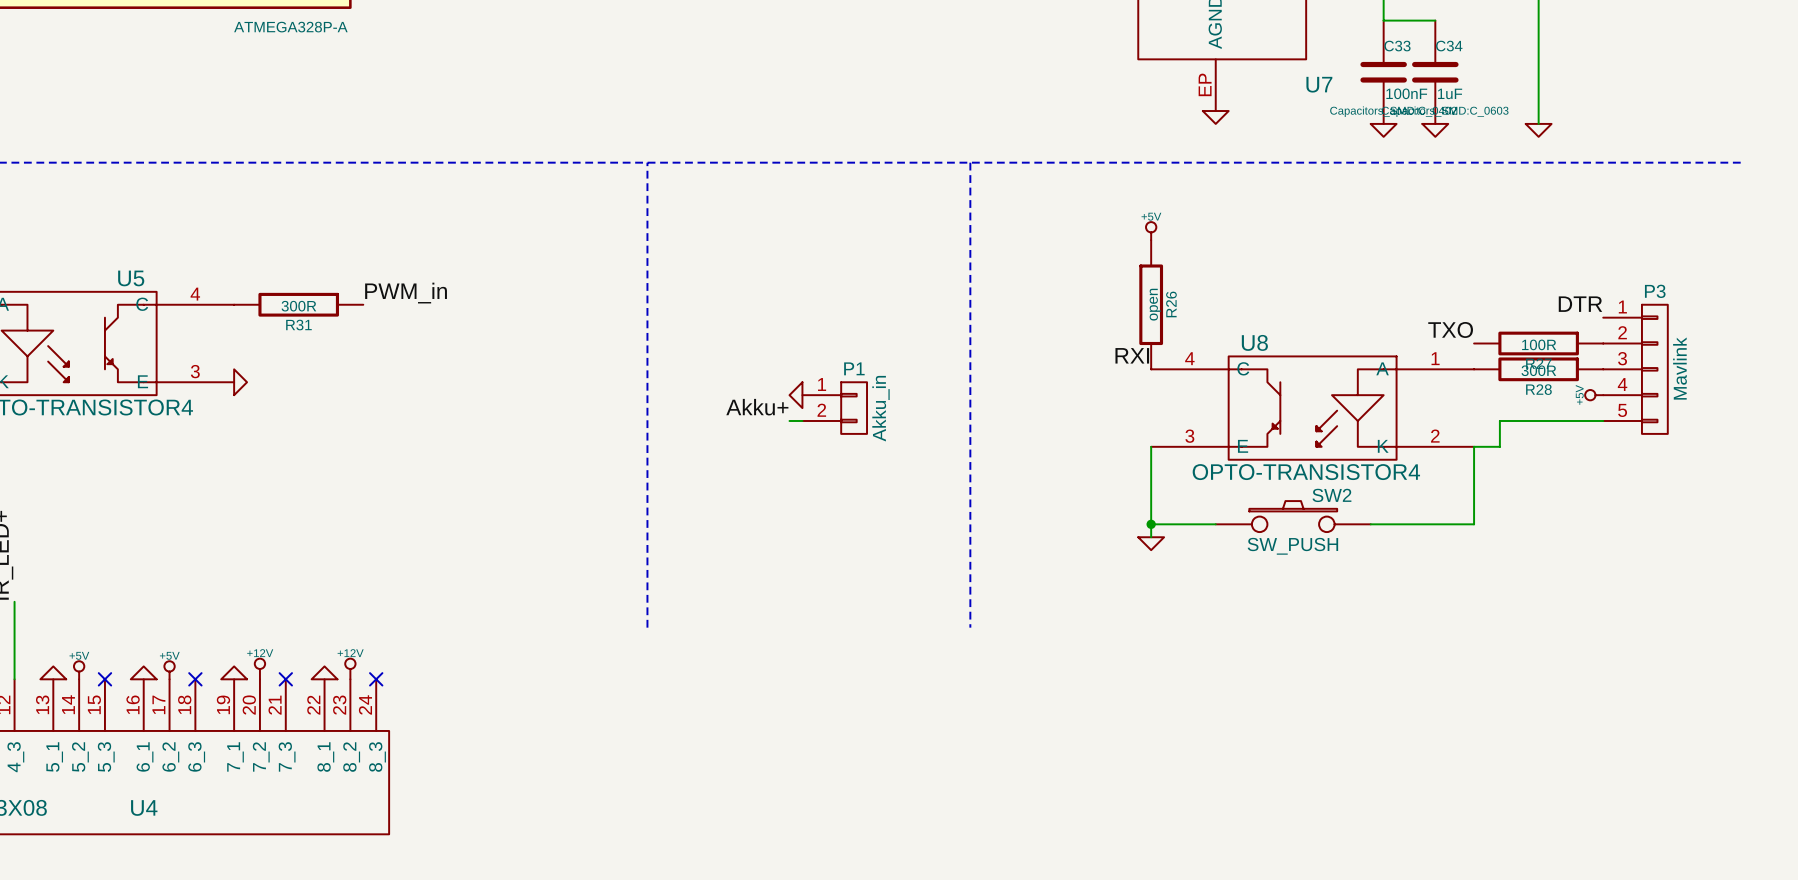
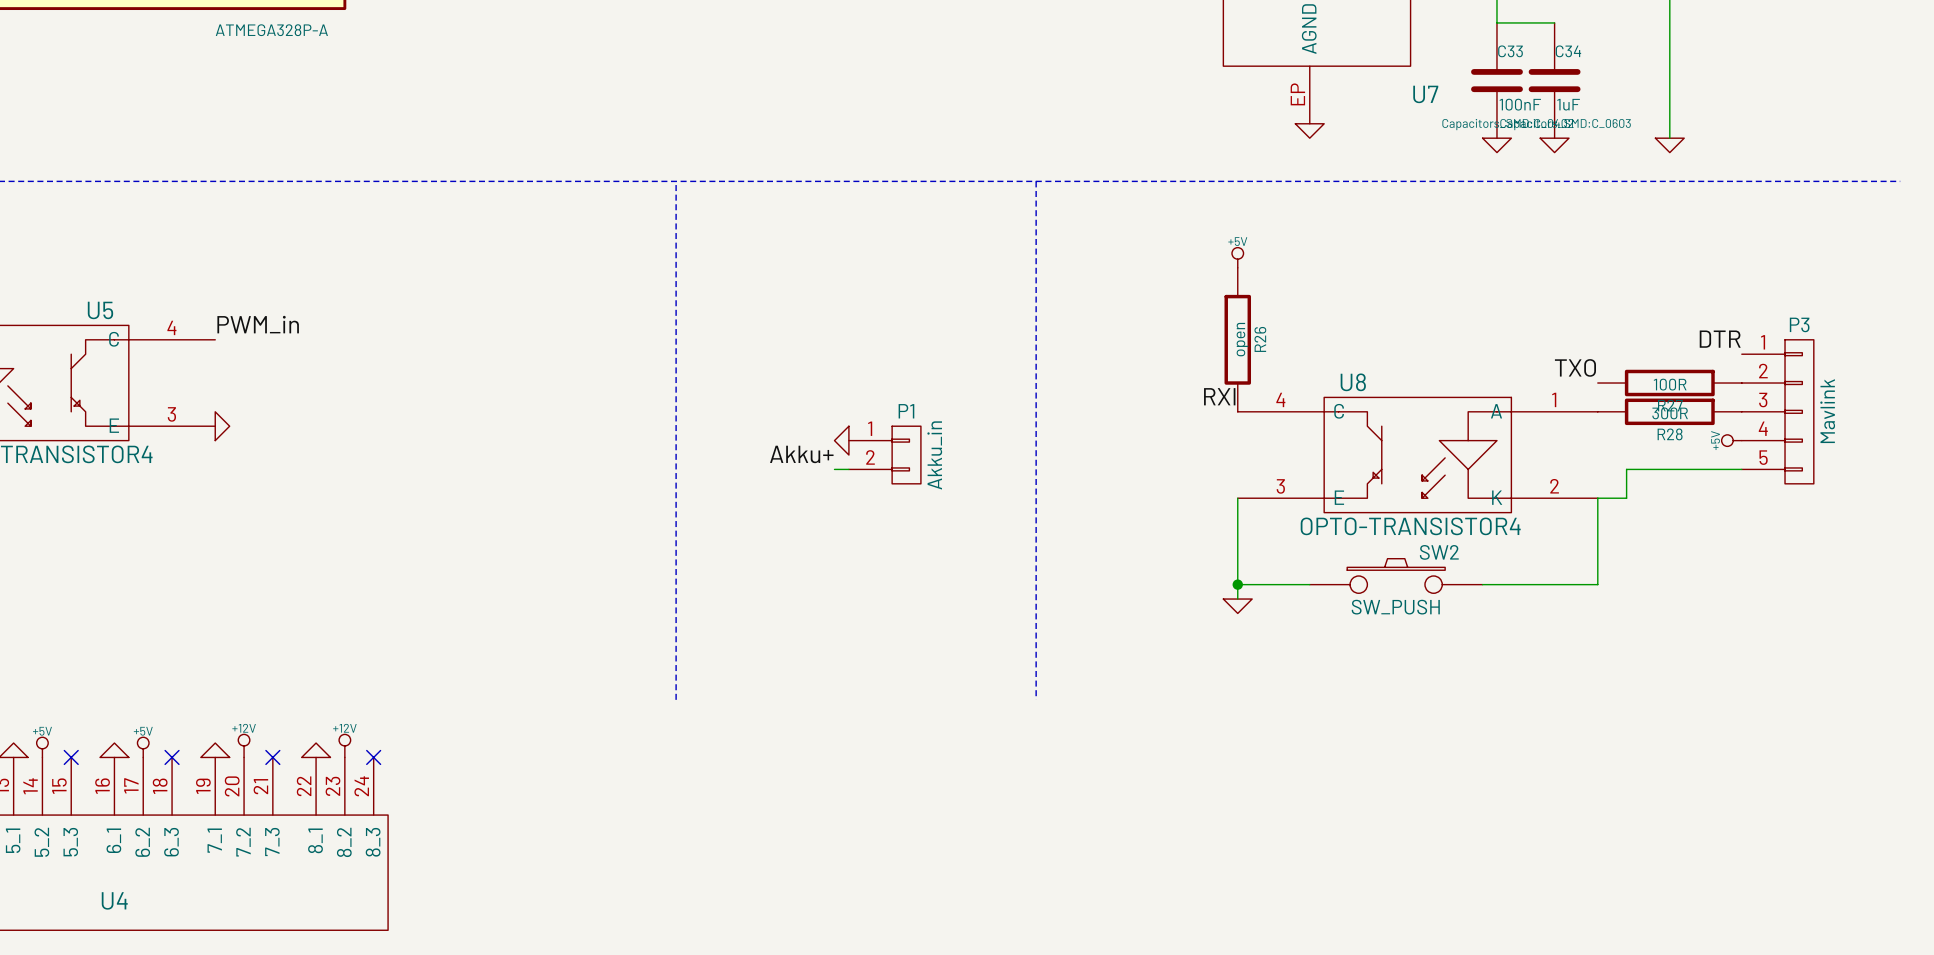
label position: PWM_in (406, 293) -> PWM_in (258, 324)
R31: 300R (298, 304) -> none

